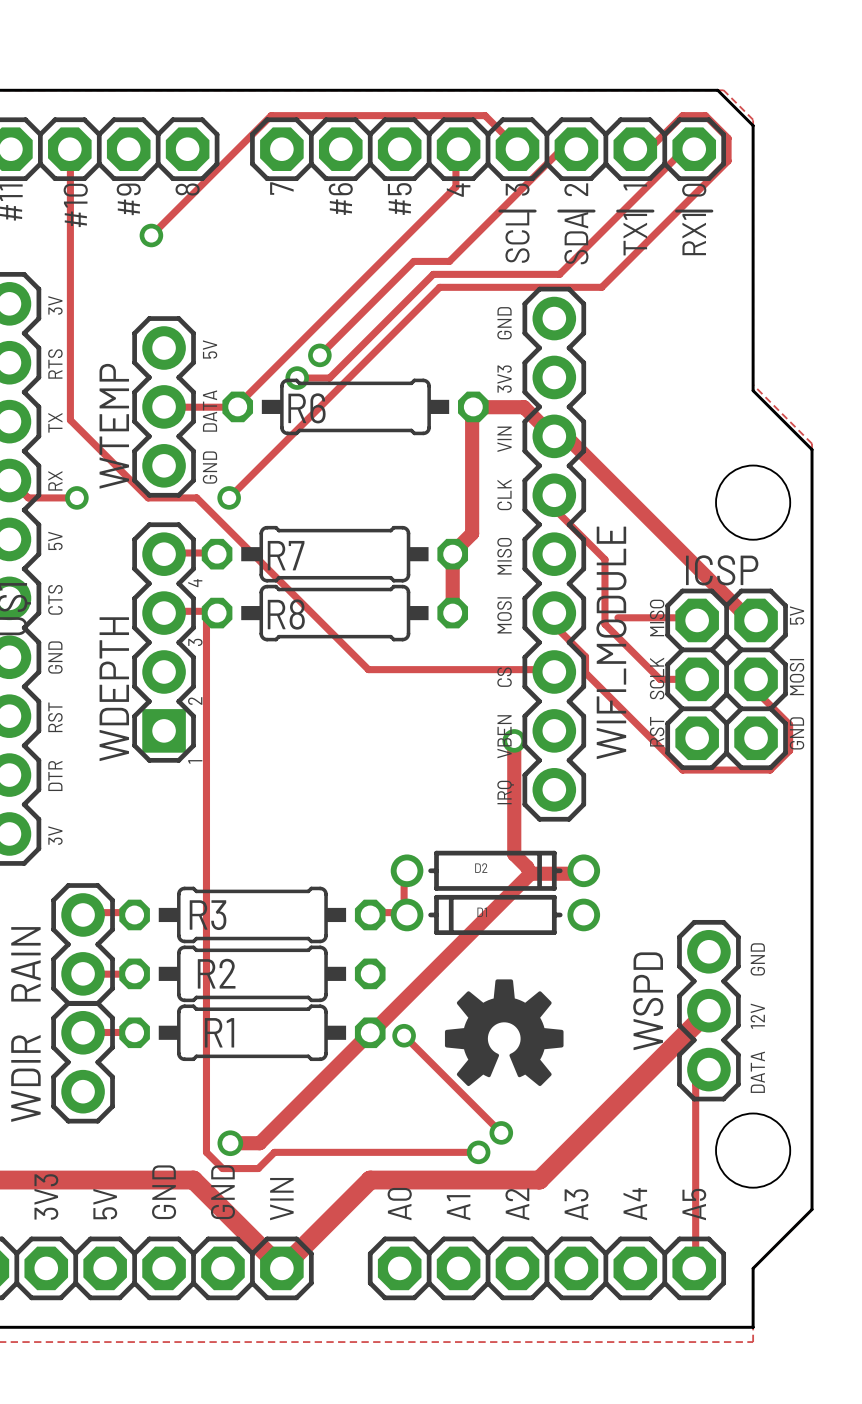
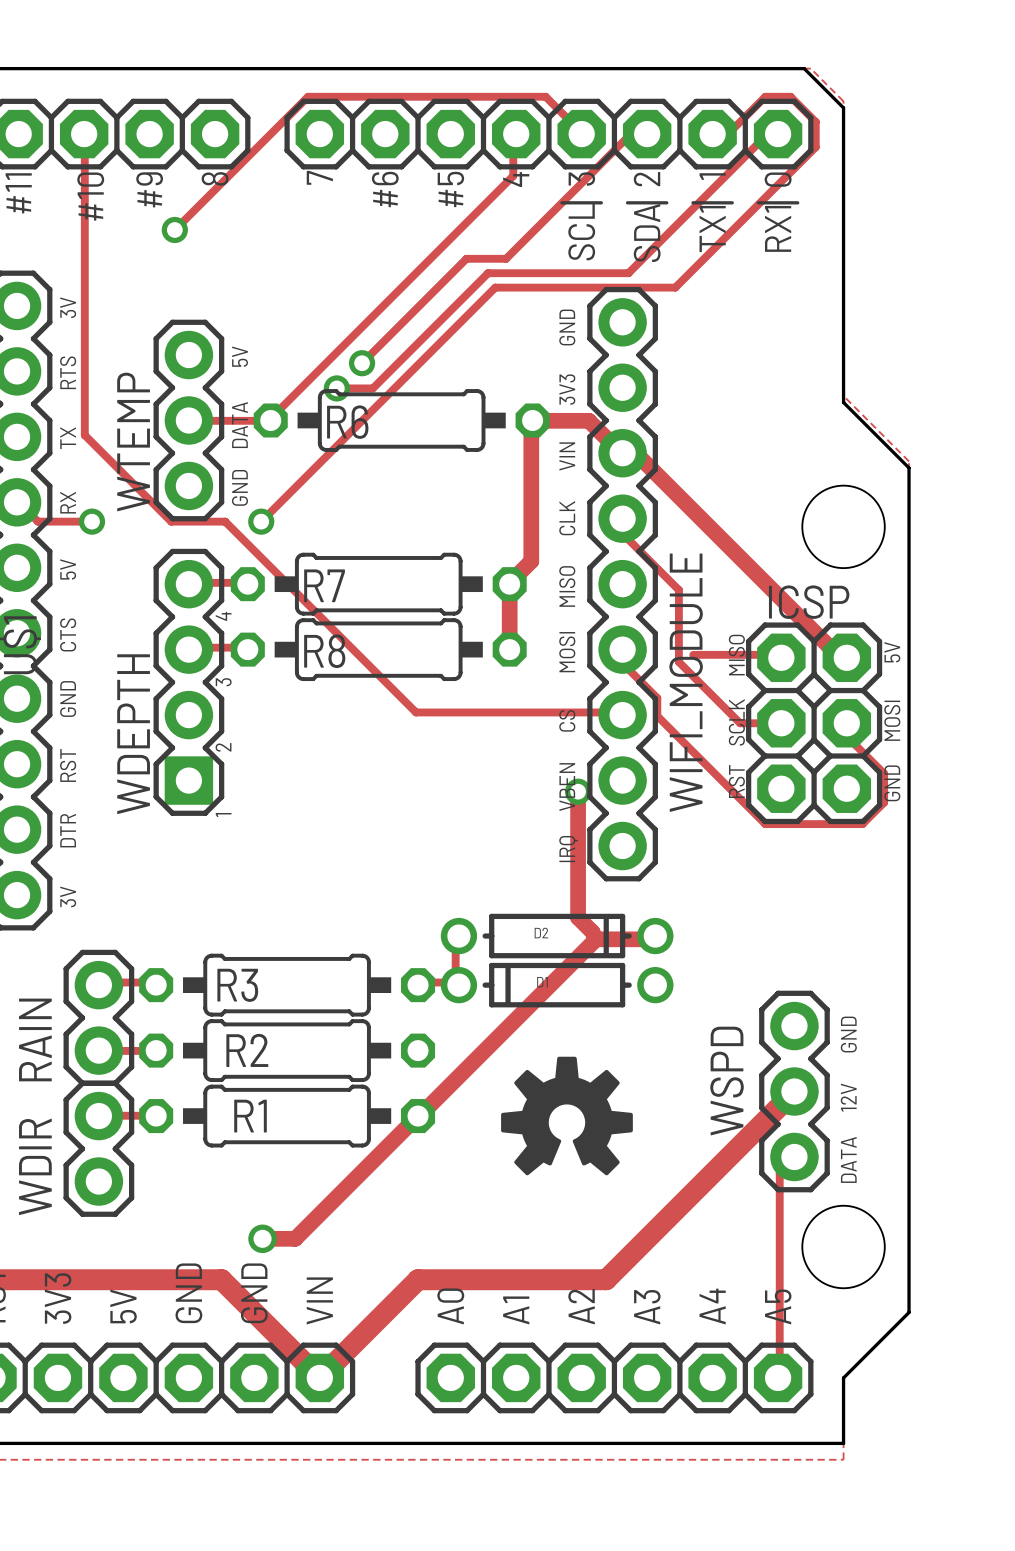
track: (217, 613) (206, 614) (206, 1152) (222, 1168) (258, 1168) (274, 1152) (478, 1152) -> none
track: (404, 1035) (501, 1132) -> none
via: (404, 1035) -> none
via: (501, 1132) -> none
via: (478, 1152) -> none

